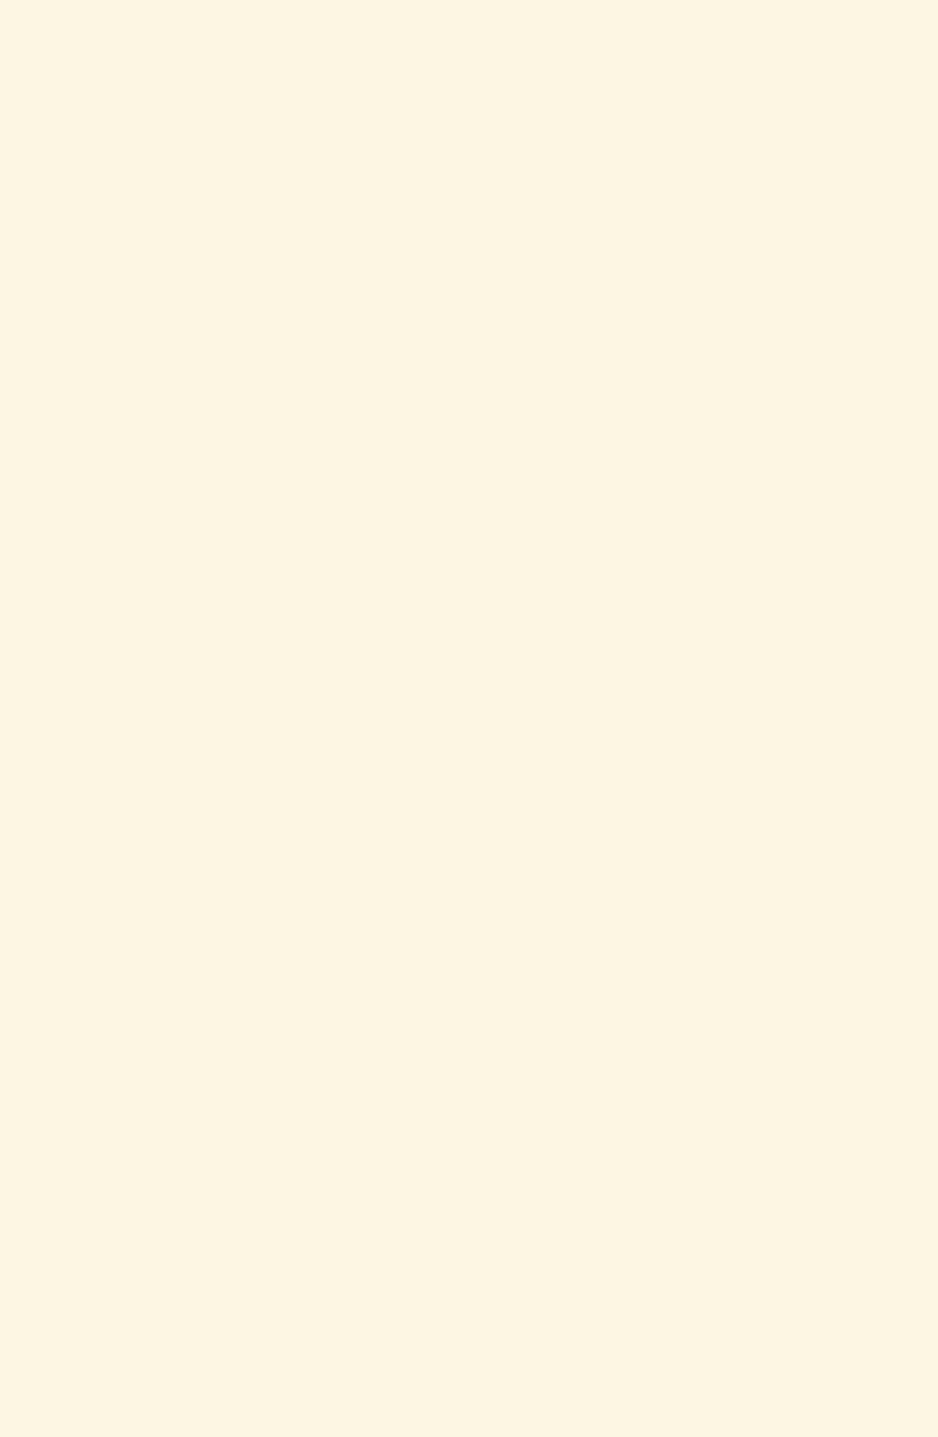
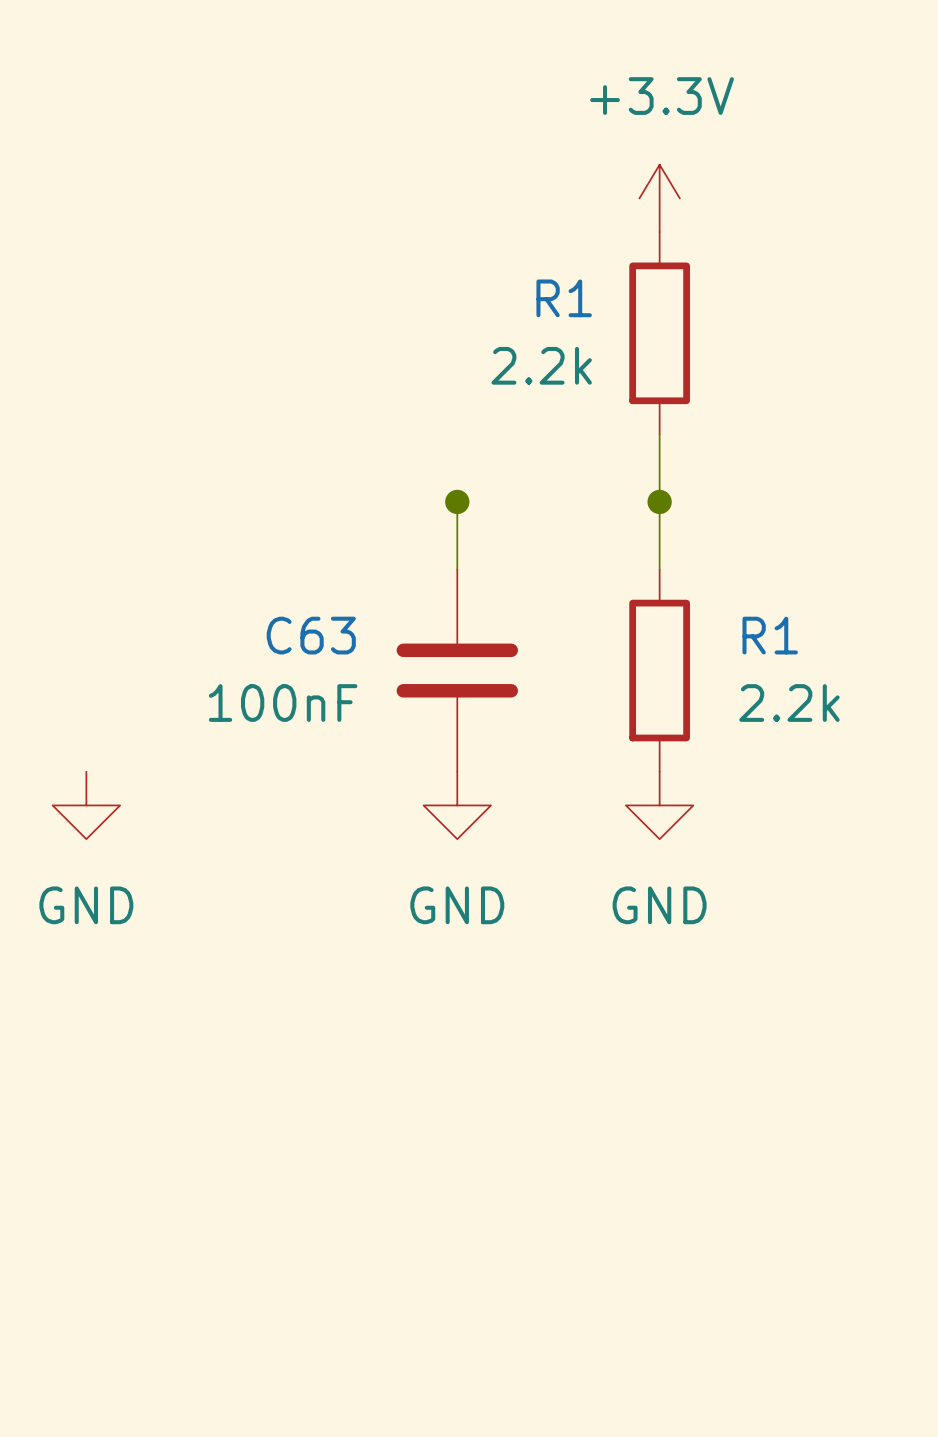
power symbol: none -> +3.3V (659, 198)
R1: none -> 2.2k (659, 333)
wire: none -> (659, 434) (659, 569)
wire: none -> (457, 501) (457, 569)
junction: none -> (457, 501)
junction: none -> (659, 501)
C63: none -> 100nF (457, 670)
R1: none -> 2.2k (659, 670)
power symbol: none -> GND (86, 805)
power symbol: none -> GND (457, 805)
power symbol: none -> GND (659, 805)

